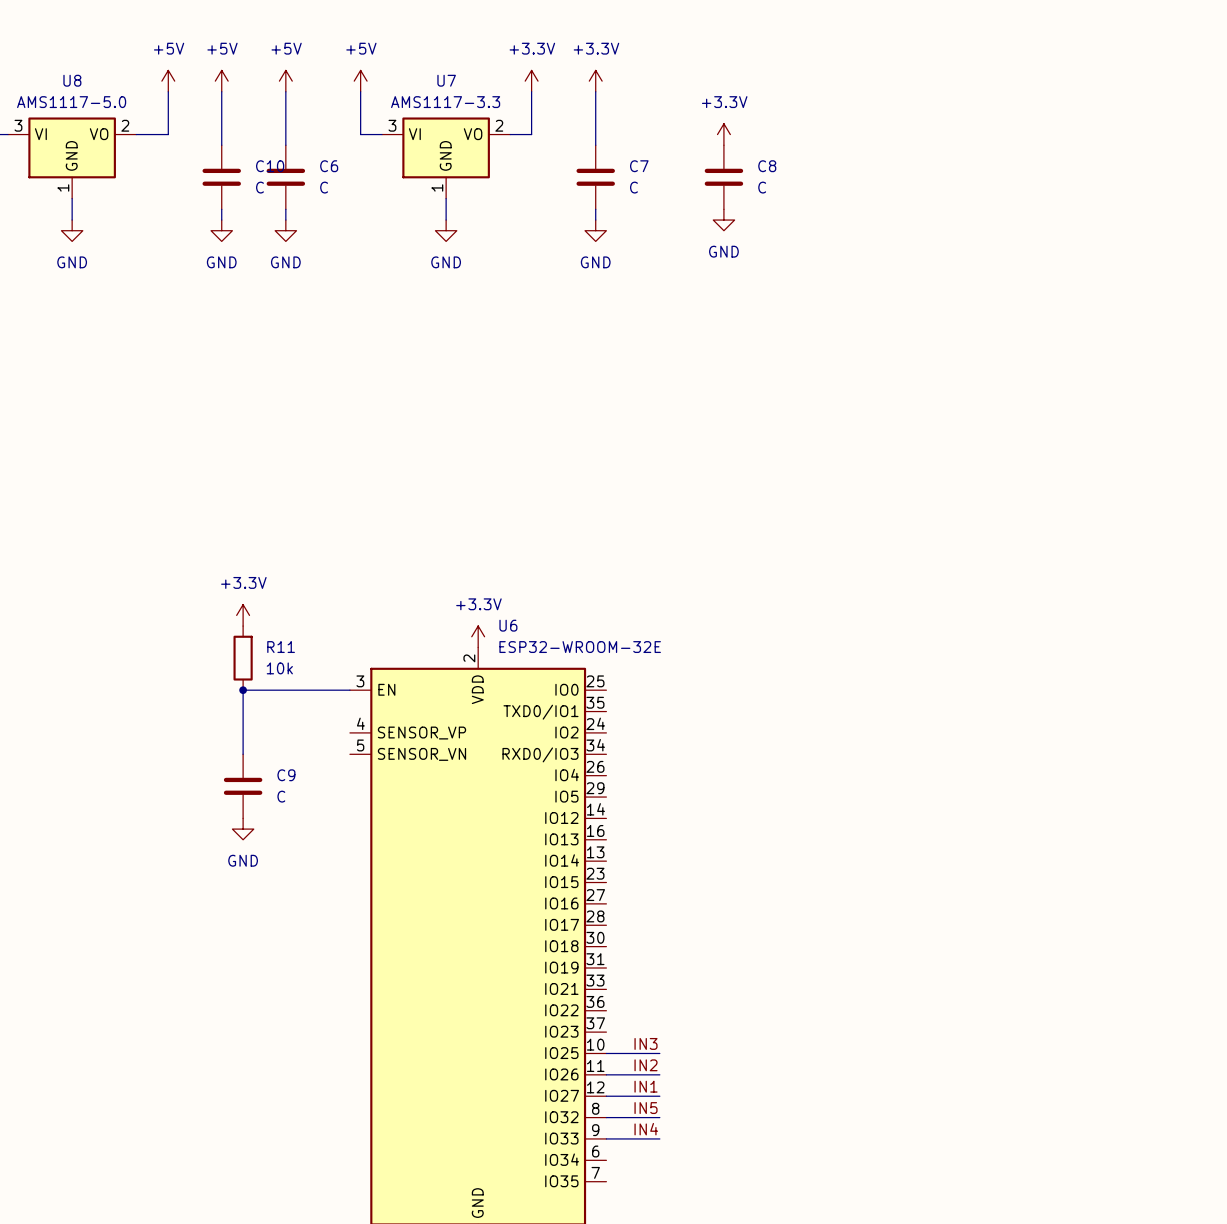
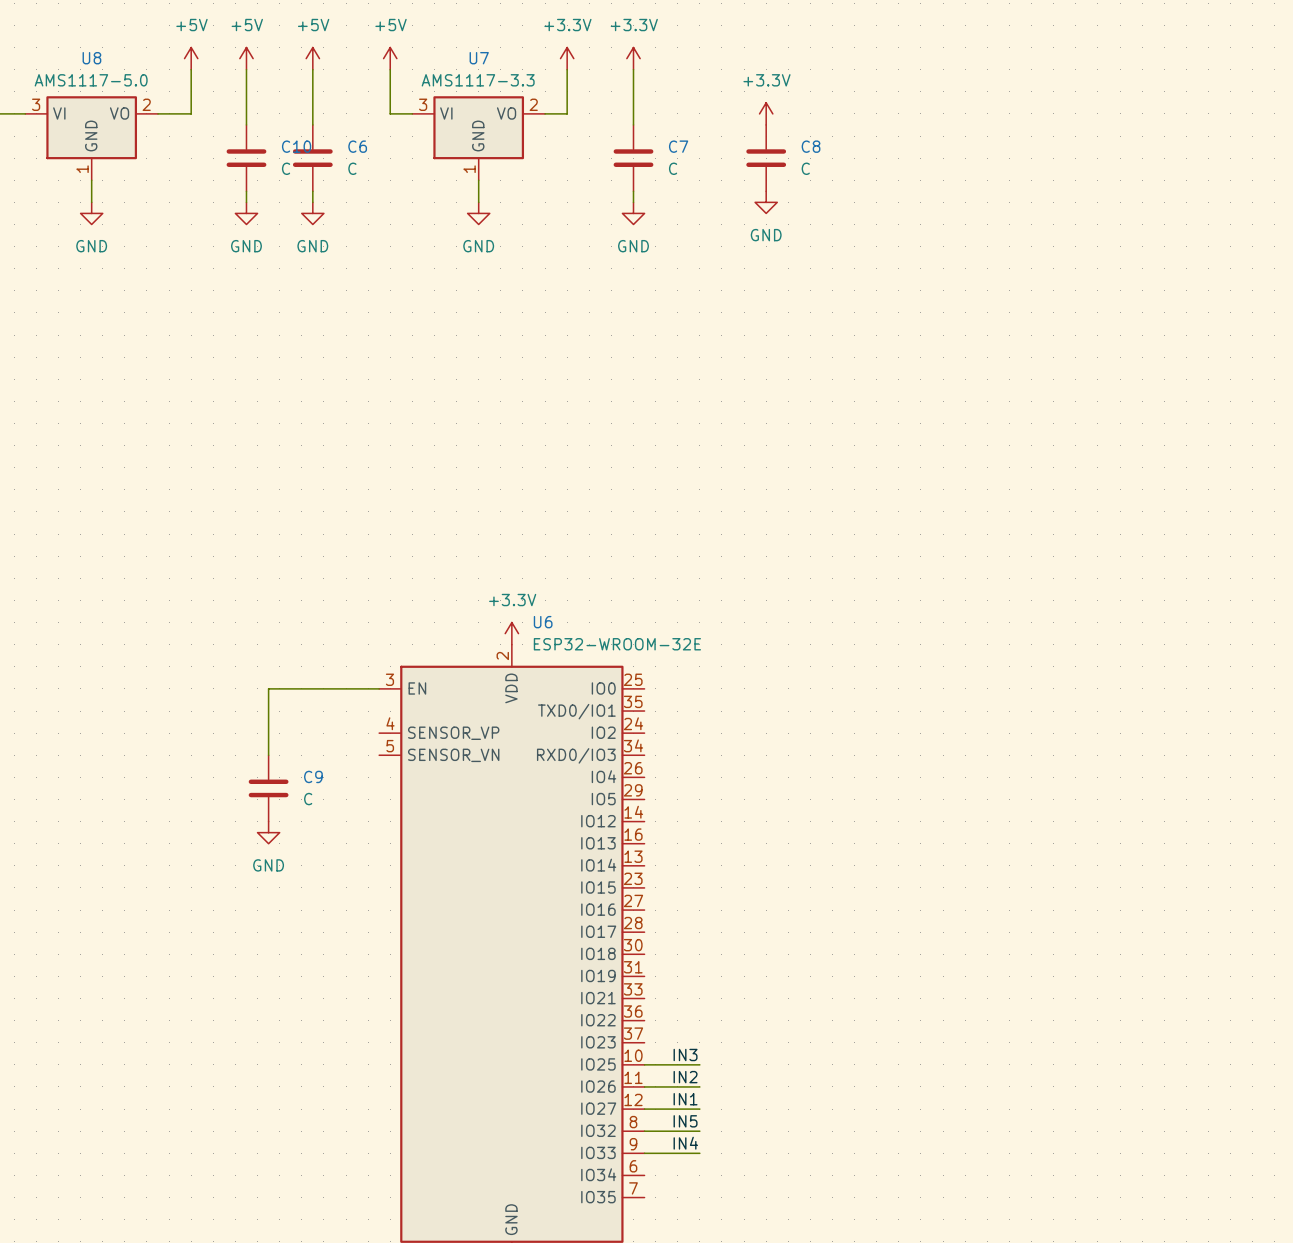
power symbol: +3.3V (243, 615) -> none
R11: 10k (243, 658) -> none
junction: (243, 690) -> none

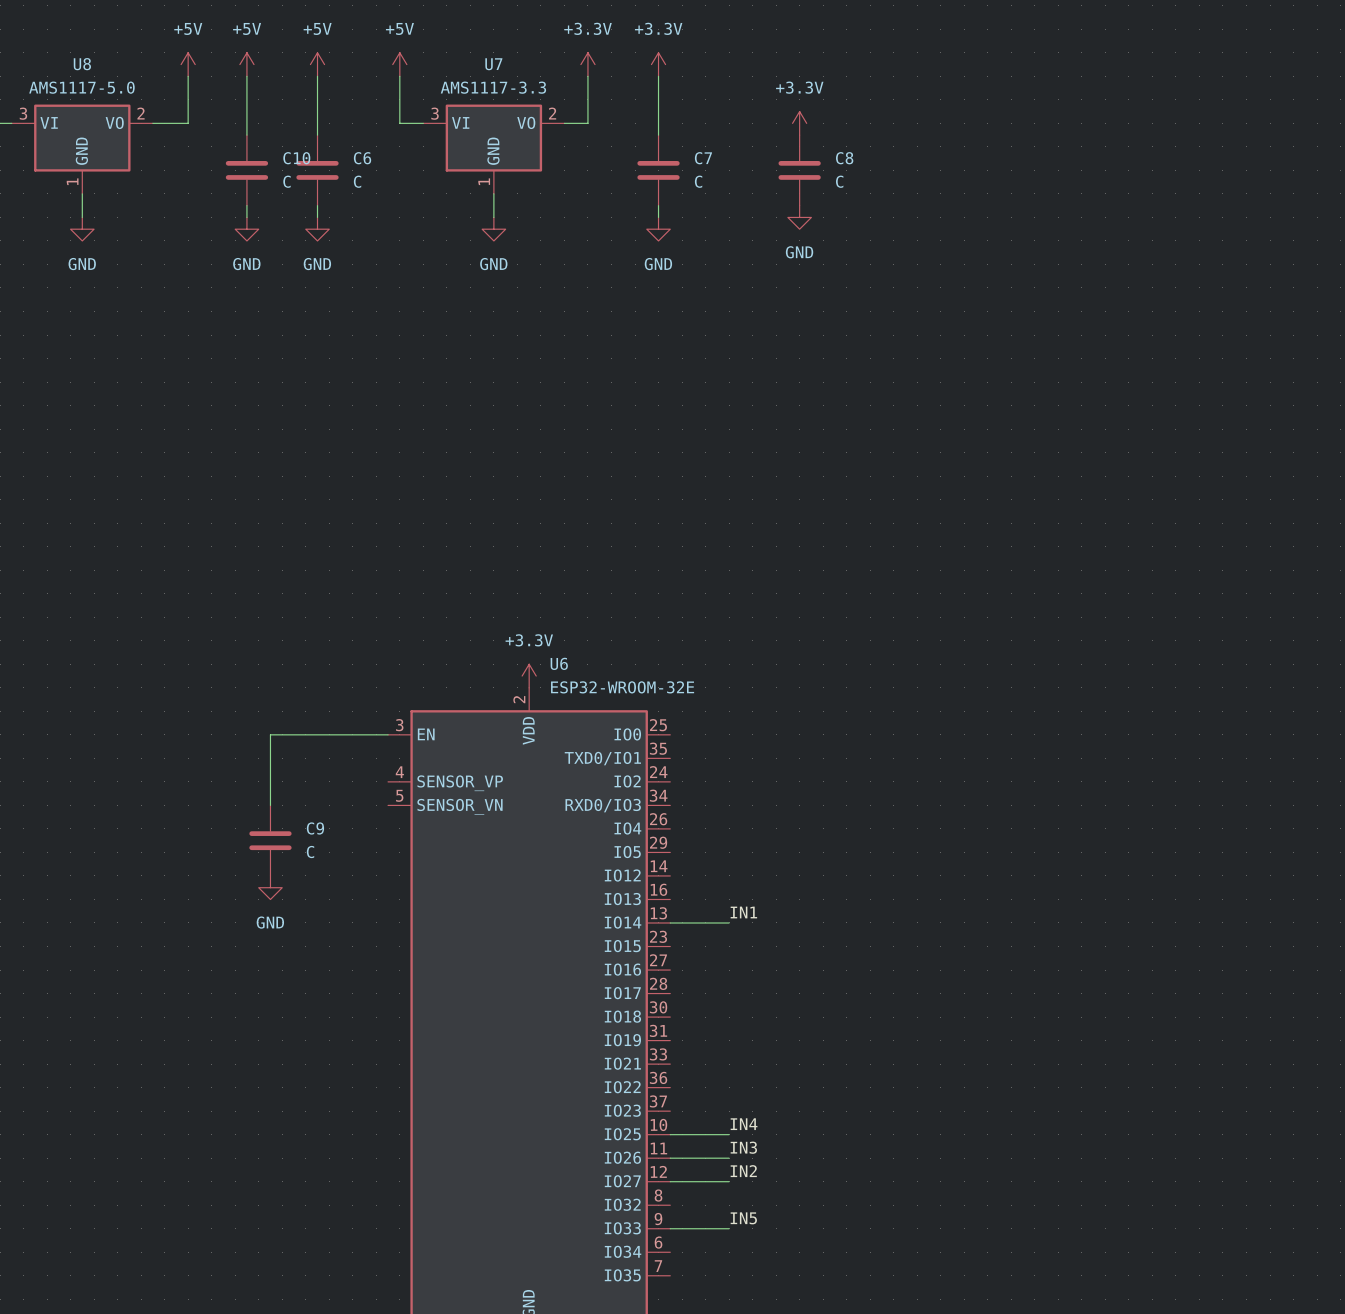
label: none -> IN1 (743, 912)
wire: none -> (670, 922) (729, 922)
label: IN3 (685, 1054) -> IN4 (744, 1124)
label: IN2 (685, 1077) -> IN3 (743, 1147)
label: IN1 (685, 1099) -> IN2 (743, 1171)
label: IN5 (685, 1121) -> none
wire: (644, 1131) (699, 1131) -> none
label: IN4 (685, 1143) -> IN5 (743, 1218)

